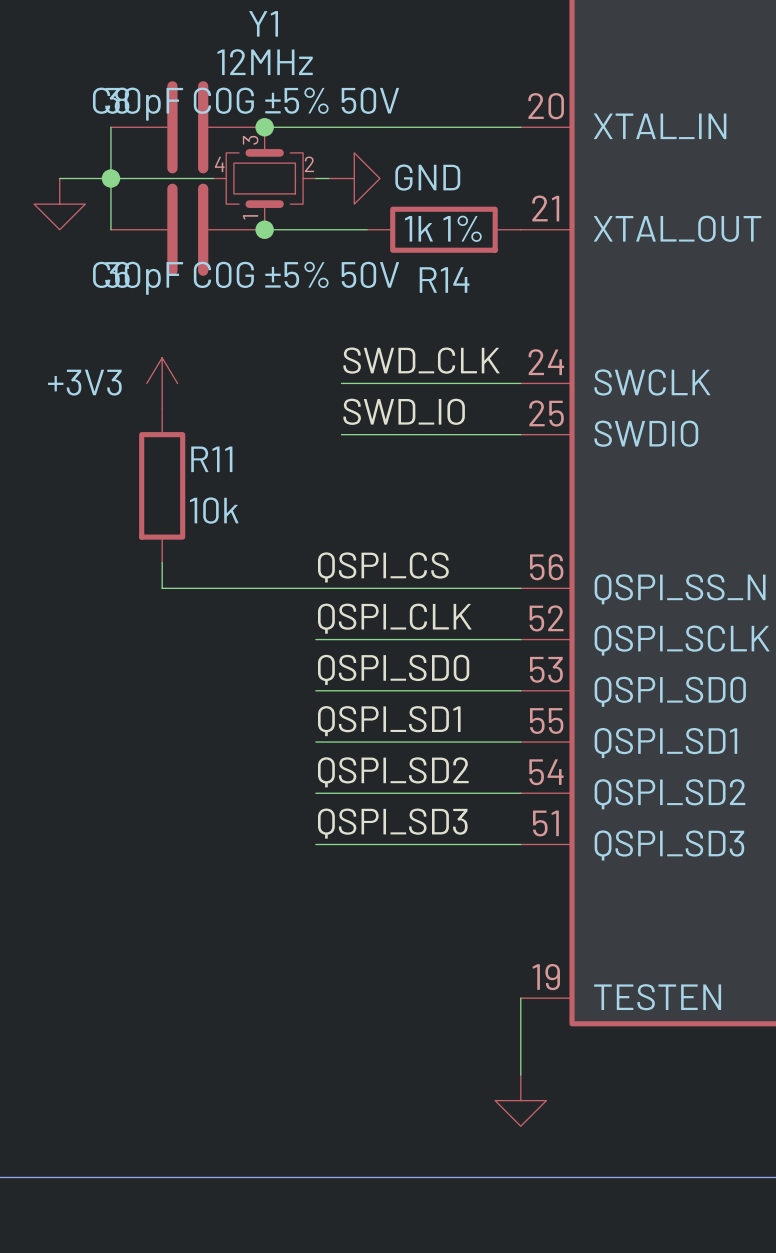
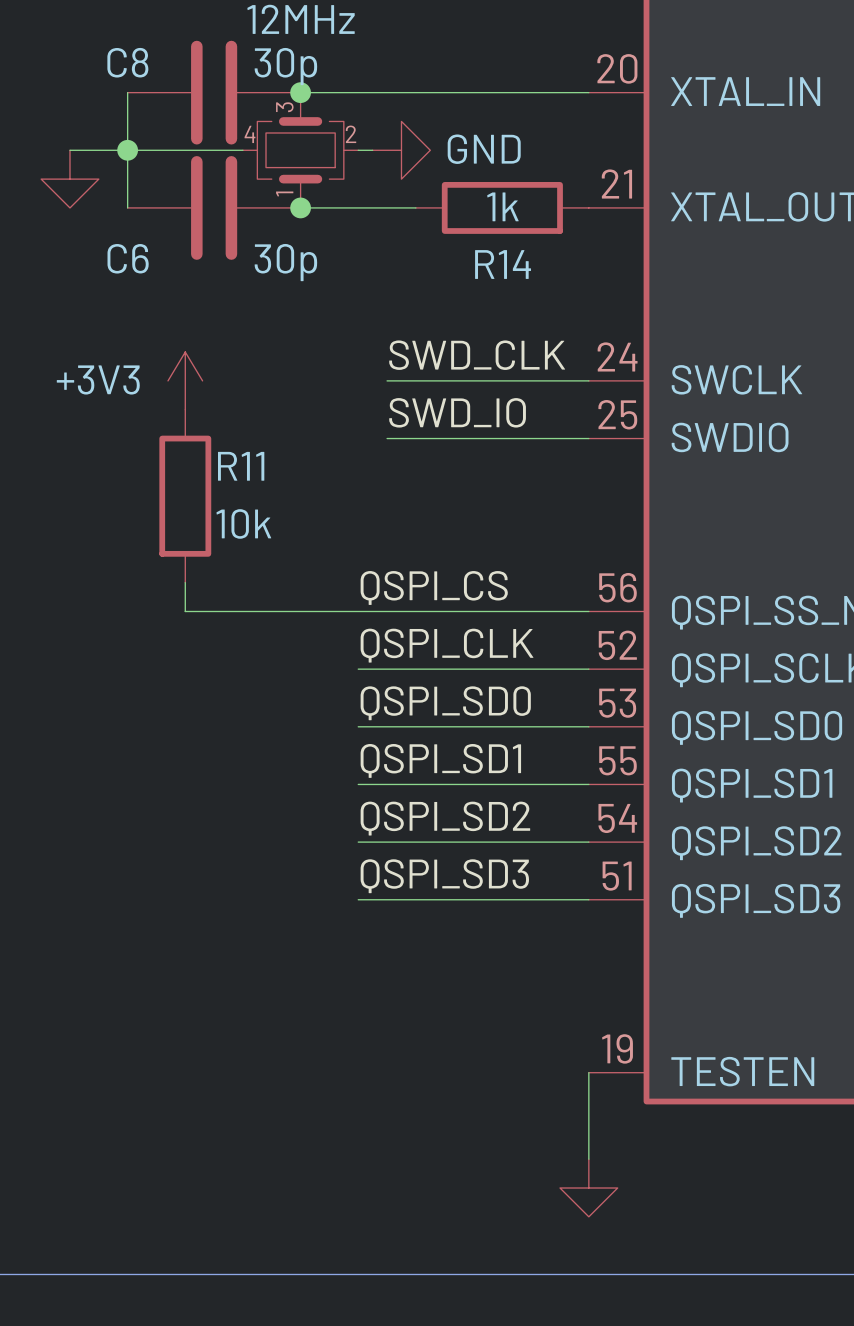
C8 value: 30pF C0G ±5% 50V (252, 104) -> 30p (285, 66)
R14 value: 1k 1% (443, 228) -> 1k (502, 206)
C6 value: 30pF C0G ±5% 50V (252, 278) -> 30p (285, 262)

